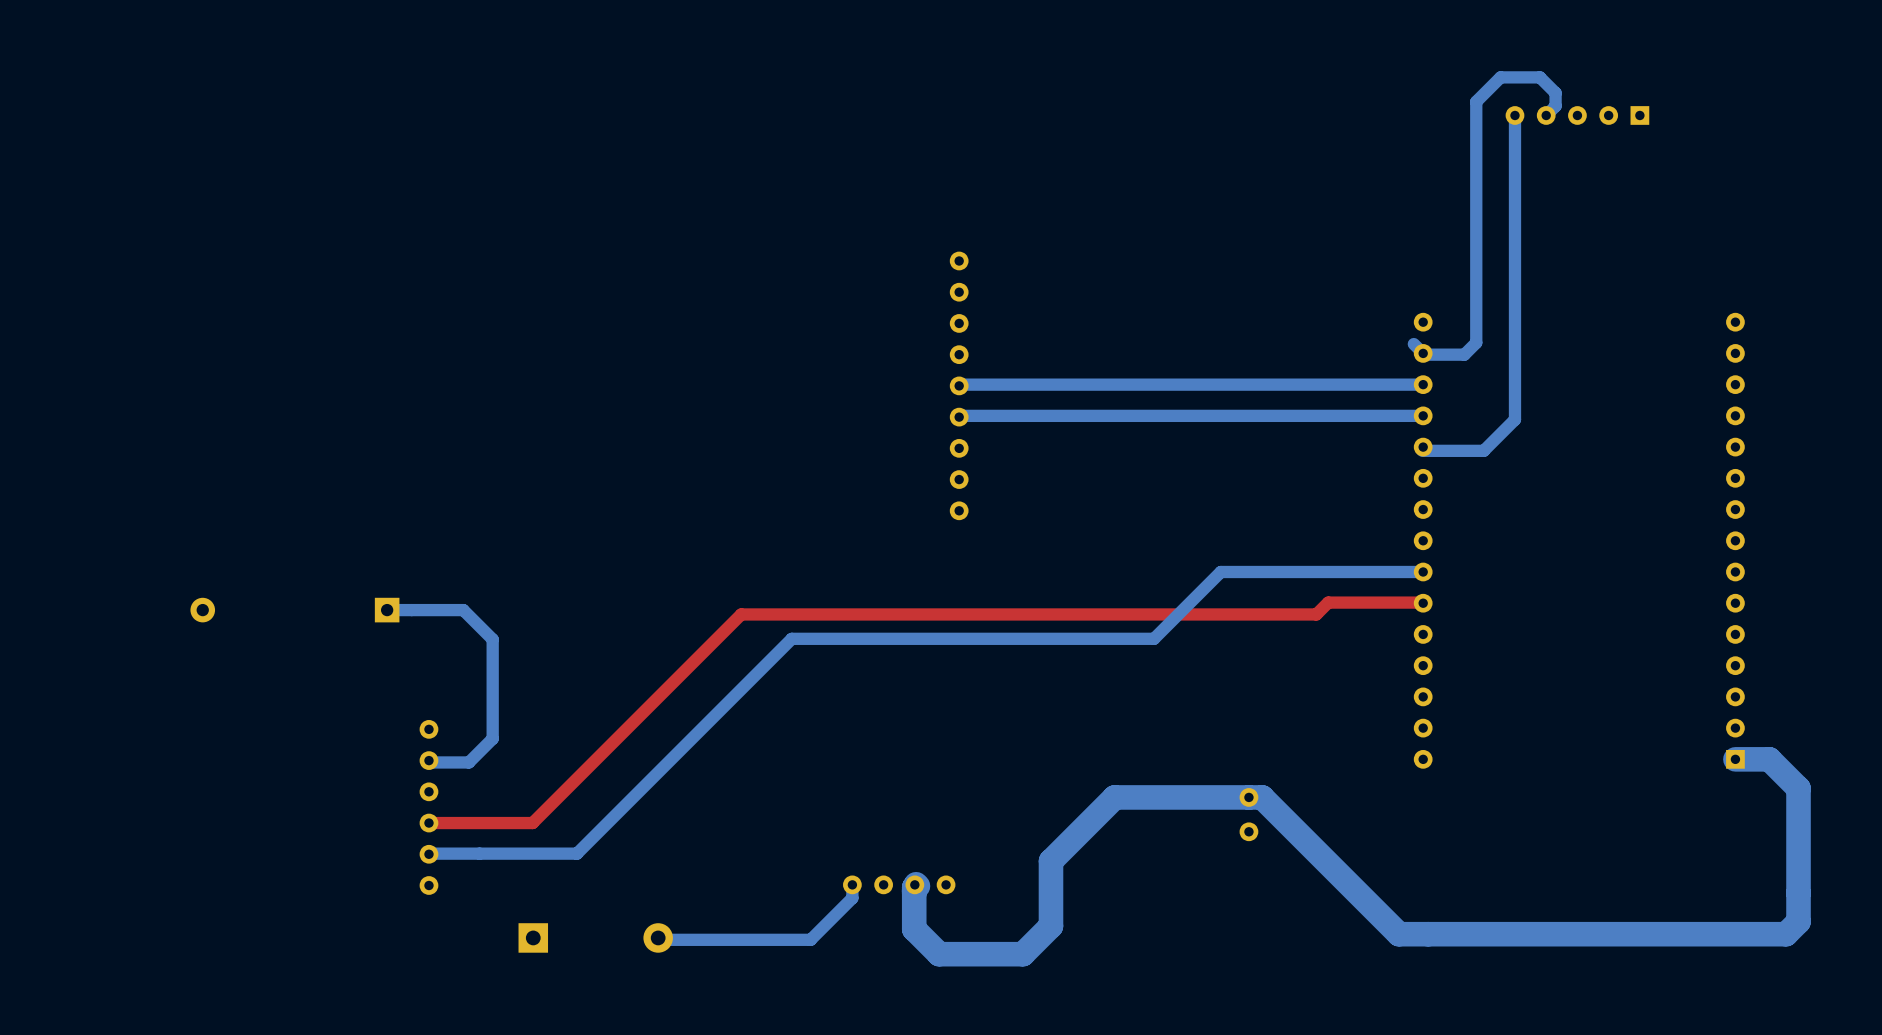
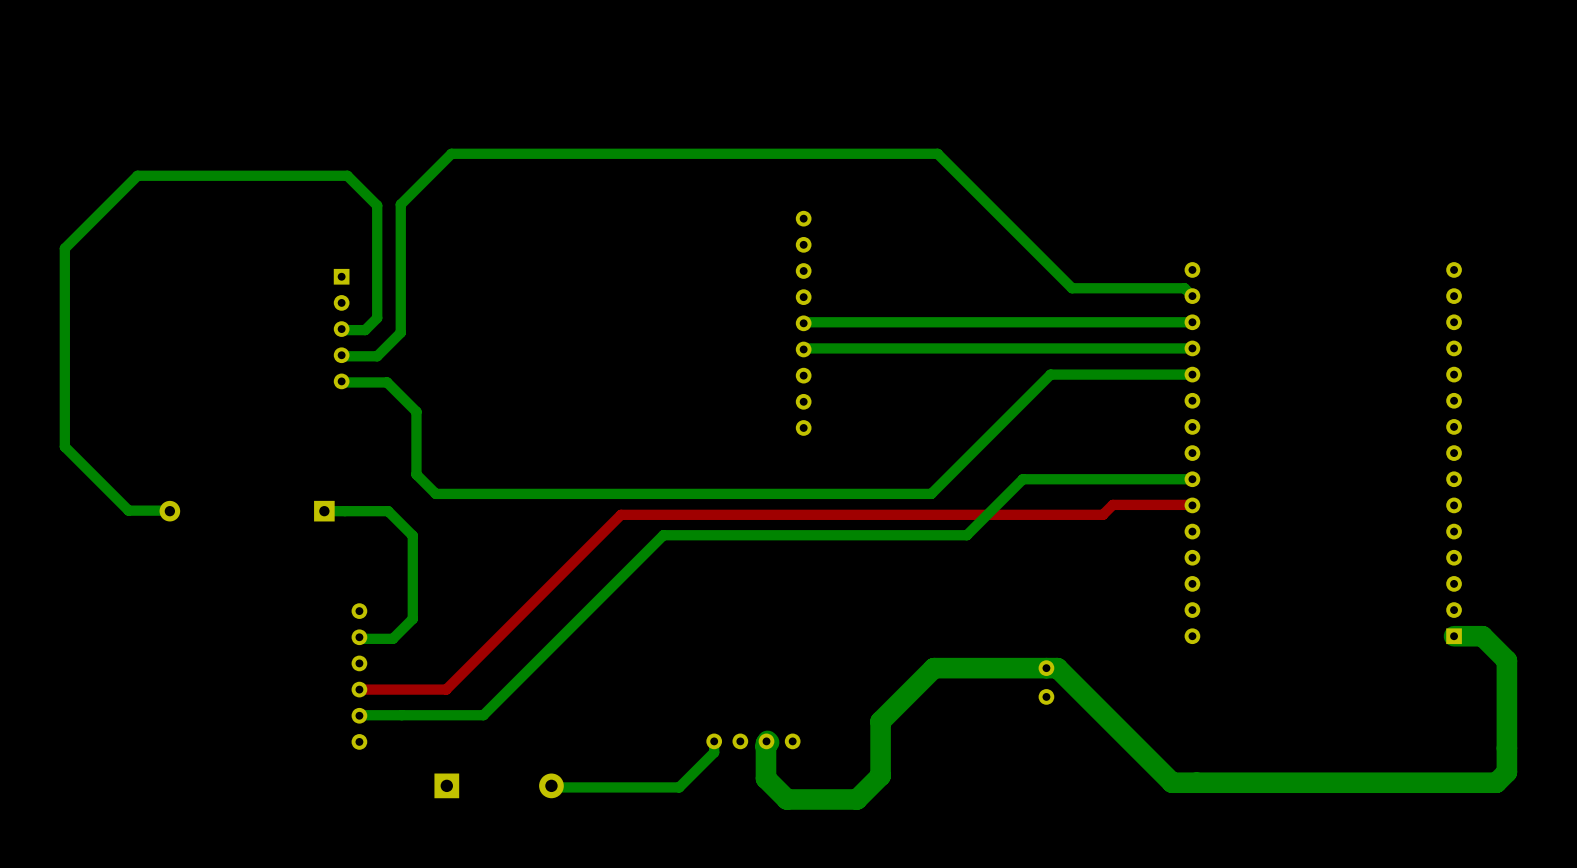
bottom track: (1514, 115) (1514, 419) (1483, 450) (1422, 450) -> none
bottom track: (1546, 115) (1555, 106) (1555, 93) (1539, 77) (1500, 77) (1476, 101) (1476, 342) (1464, 354) (1426, 354) -> none
part: (1577, 115) -> none
bottom track: none -> (1184, 288) (1072, 288) (937, 153) (451, 153) (400, 204) (400, 332) (377, 356) (344, 356)
part: none -> (341, 329)
bottom track: none -> (343, 330) (365, 330) (377, 318) (377, 205) (347, 175) (137, 175) (64, 248) (64, 446) (128, 510) (167, 510)
bottom track: none -> (1192, 374) (1050, 374) (931, 493) (435, 493) (416, 474) (416, 411) (387, 382) (343, 382)

